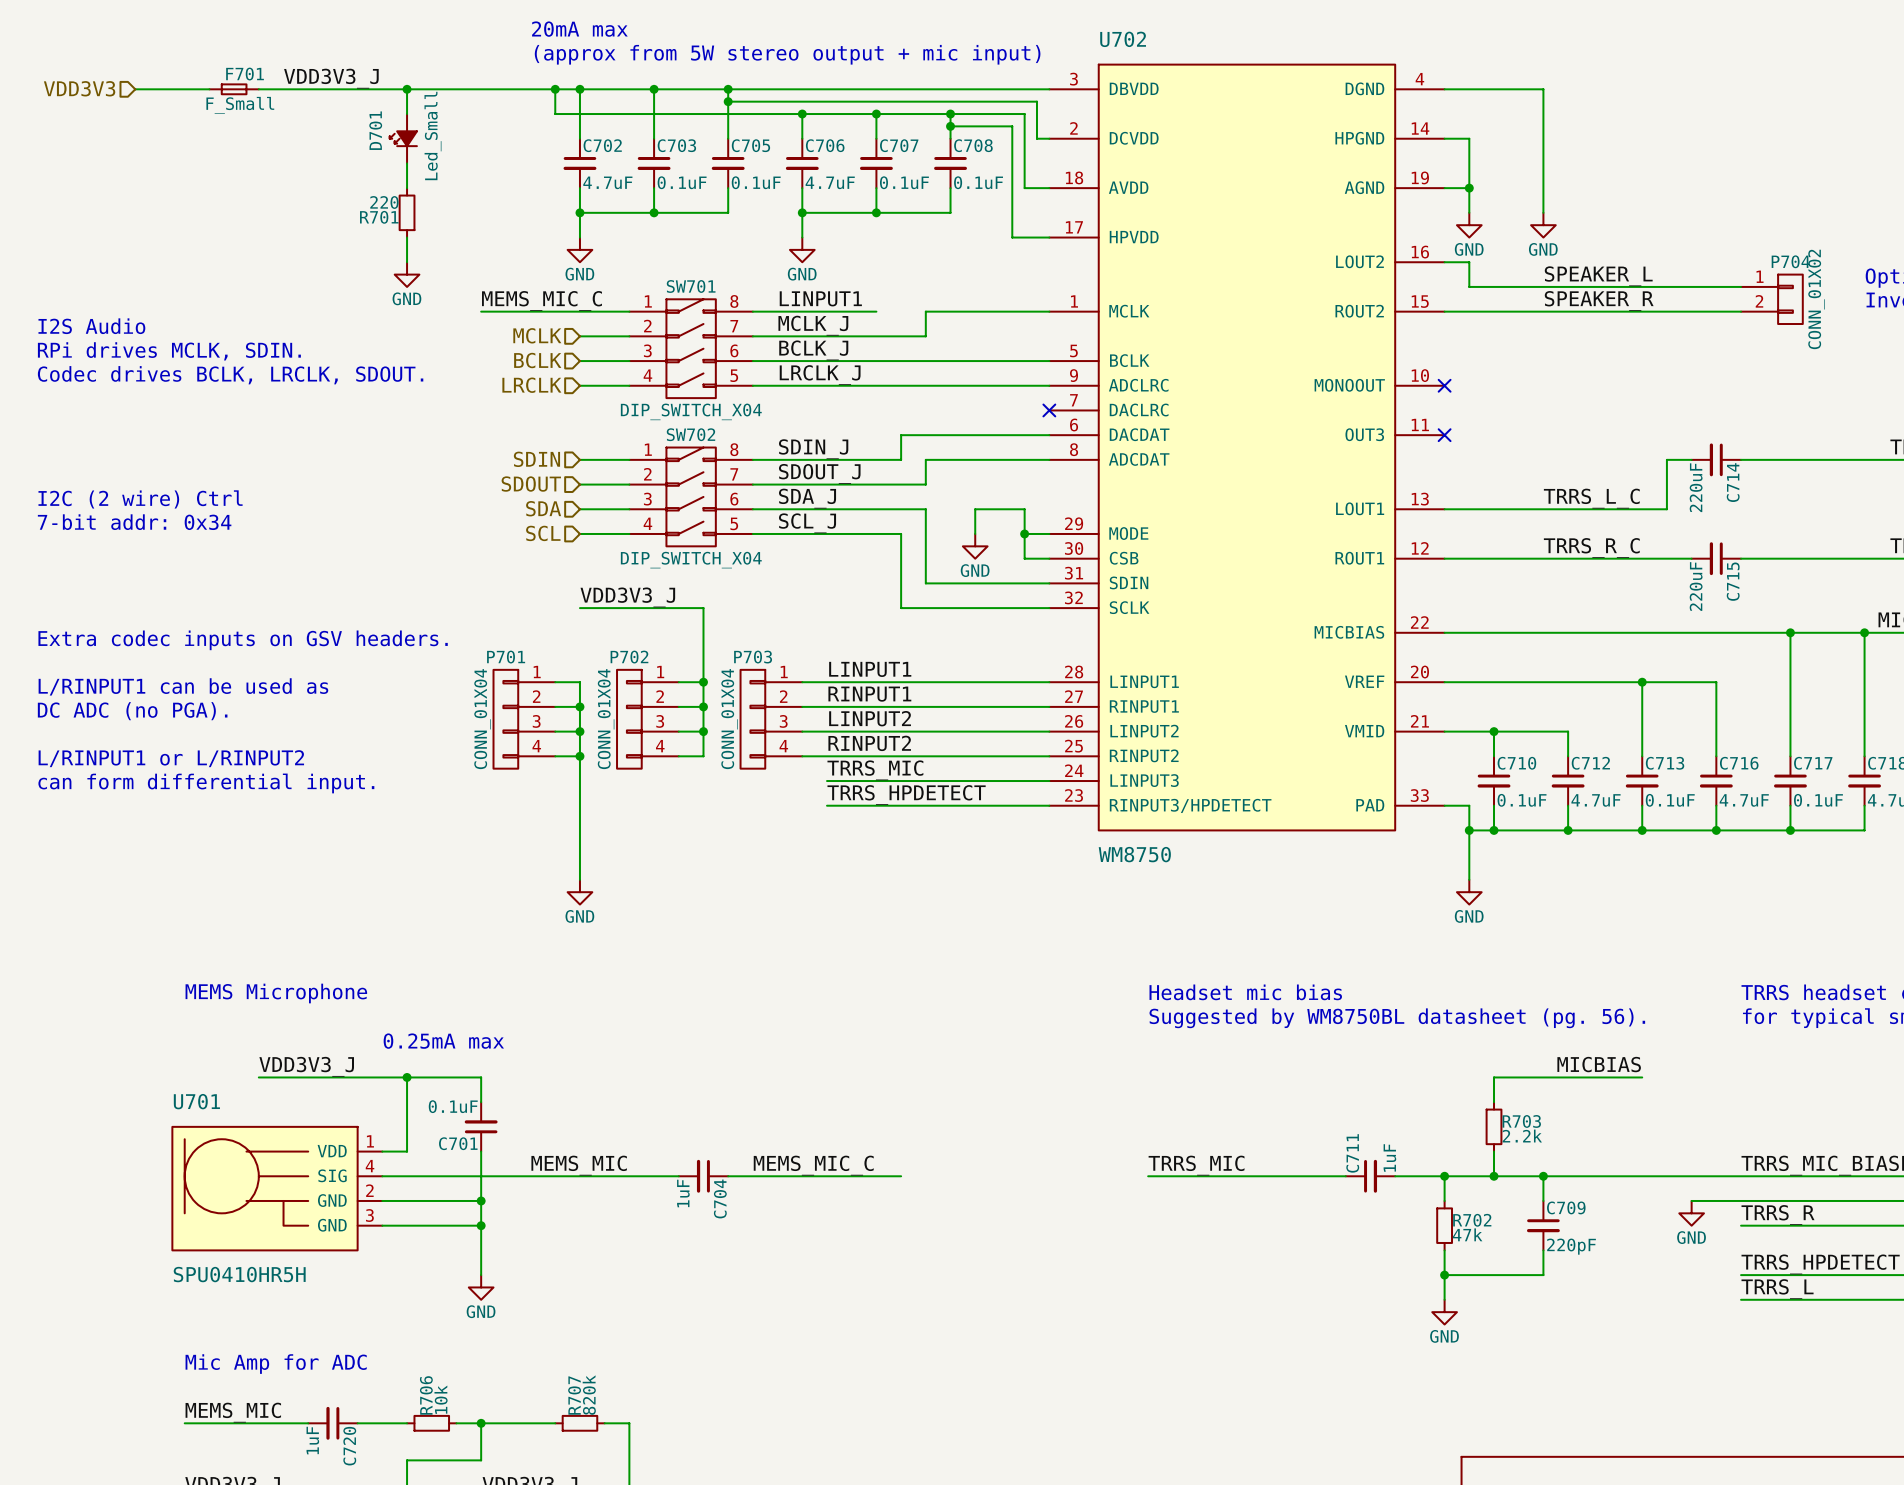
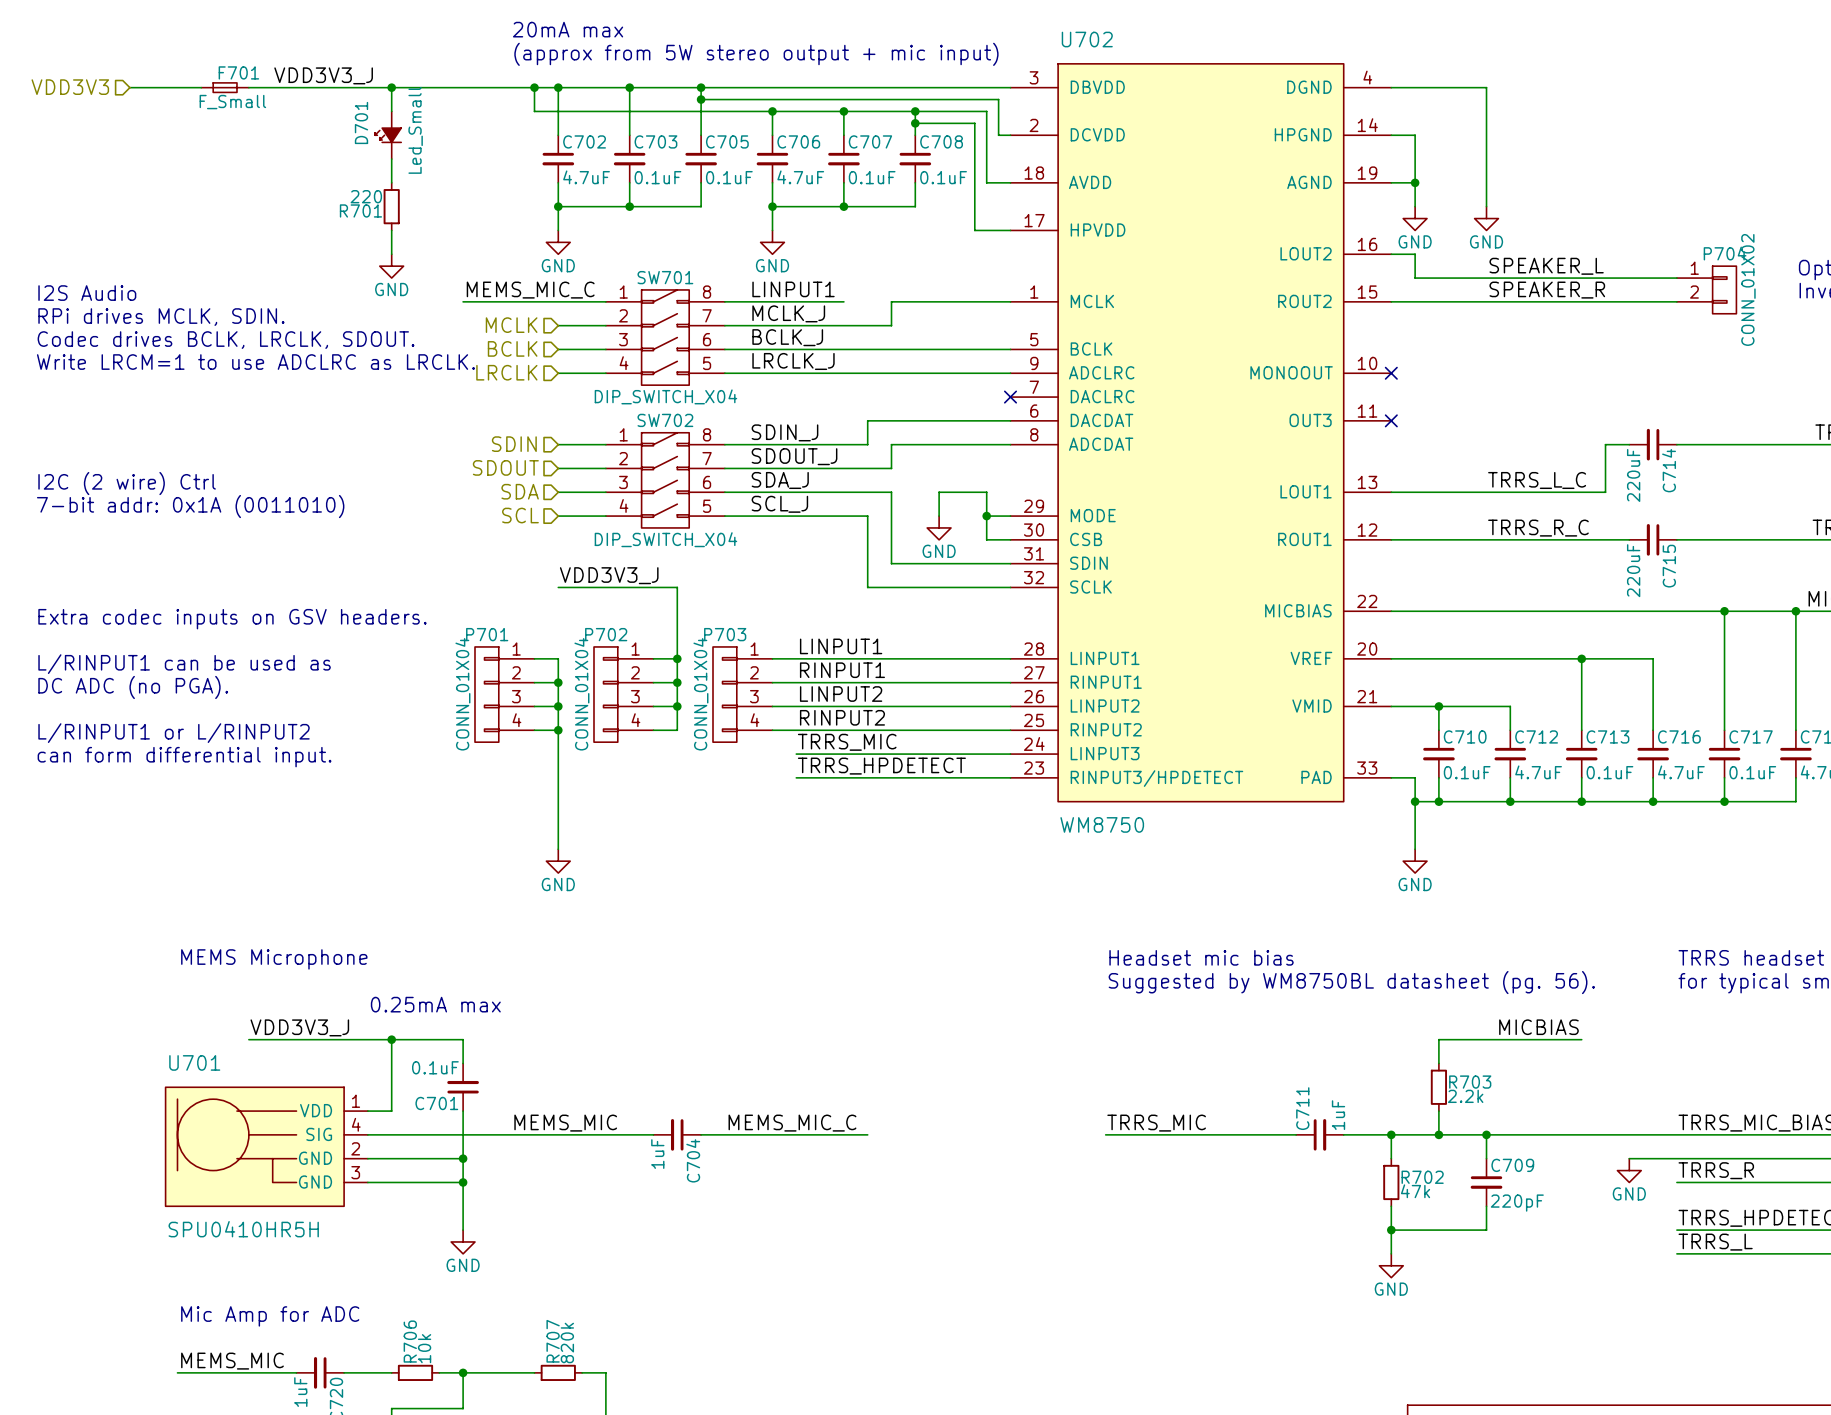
text: none -> I2S Audio (87, 293)
text: I2S Audio (91, 326) -> RPi drives MCLK, SDIN. (161, 317)
text: RPi drives MCLK, SDIN. (169, 351) -> Codec drives BCLK, LRCLK, SDOUT. (226, 340)
text: Codec drives BCLK, LRCLK, SDOUT. (230, 375) -> Write LRCM=1 to use ADCLRC as LRCLK. (255, 362)
text: 7-bit addr: 0x34 (134, 522) -> 7-bit addr: 0x1A (0011010) (190, 506)

